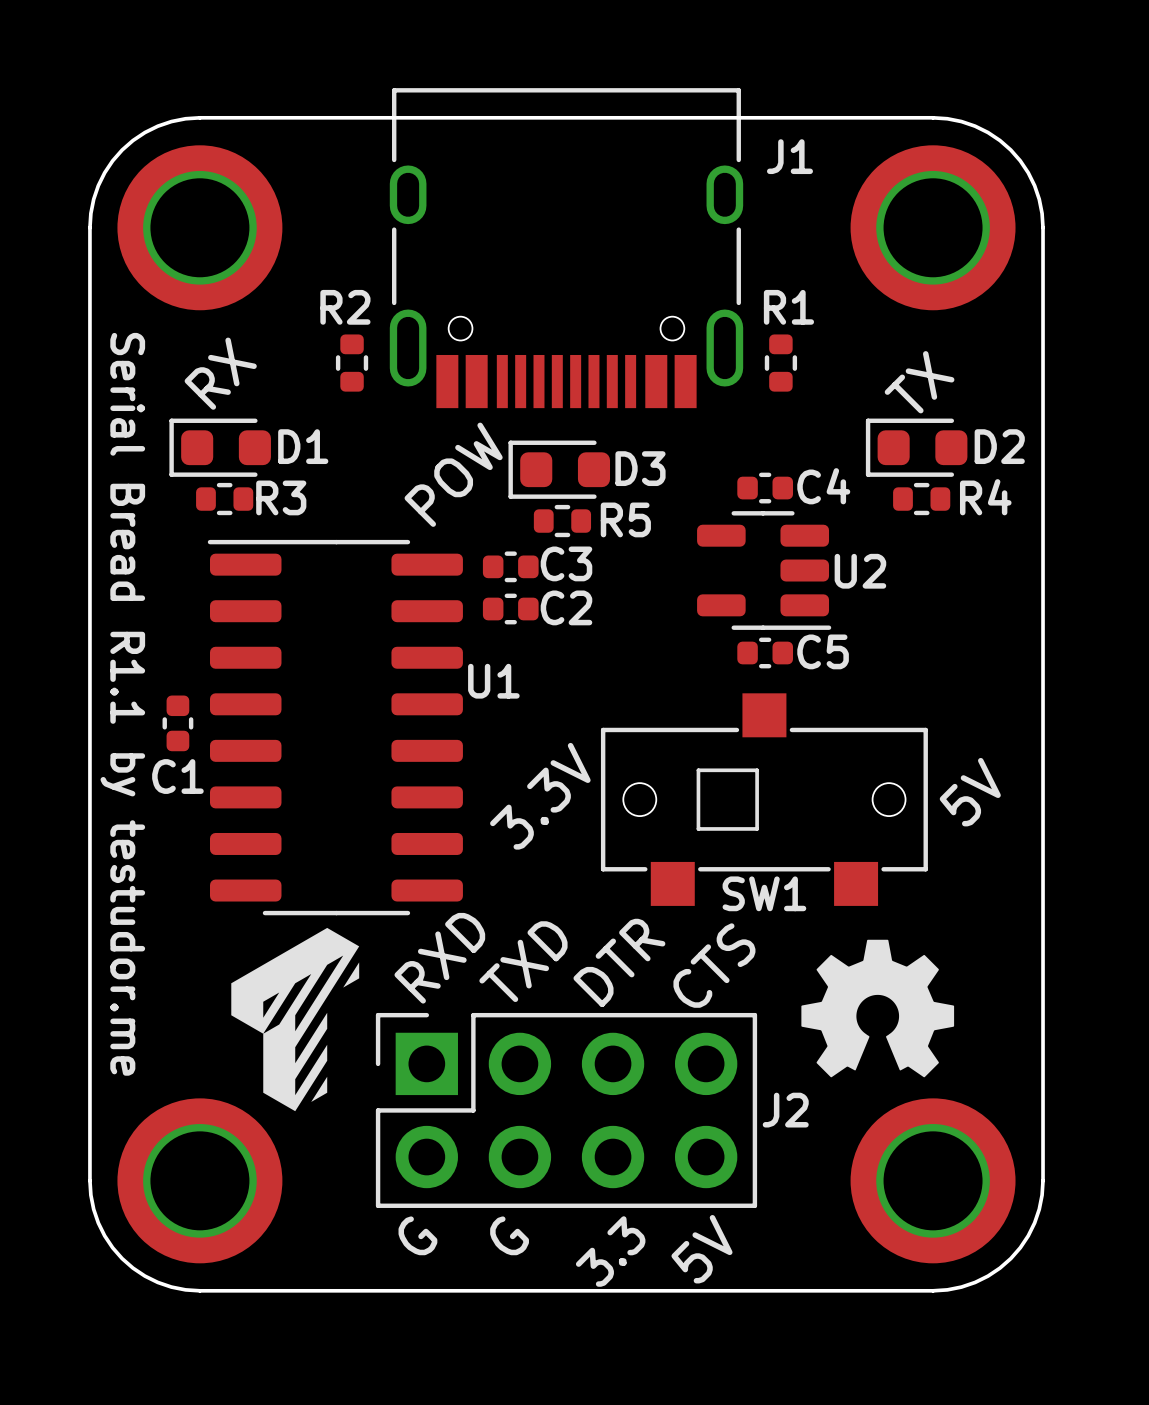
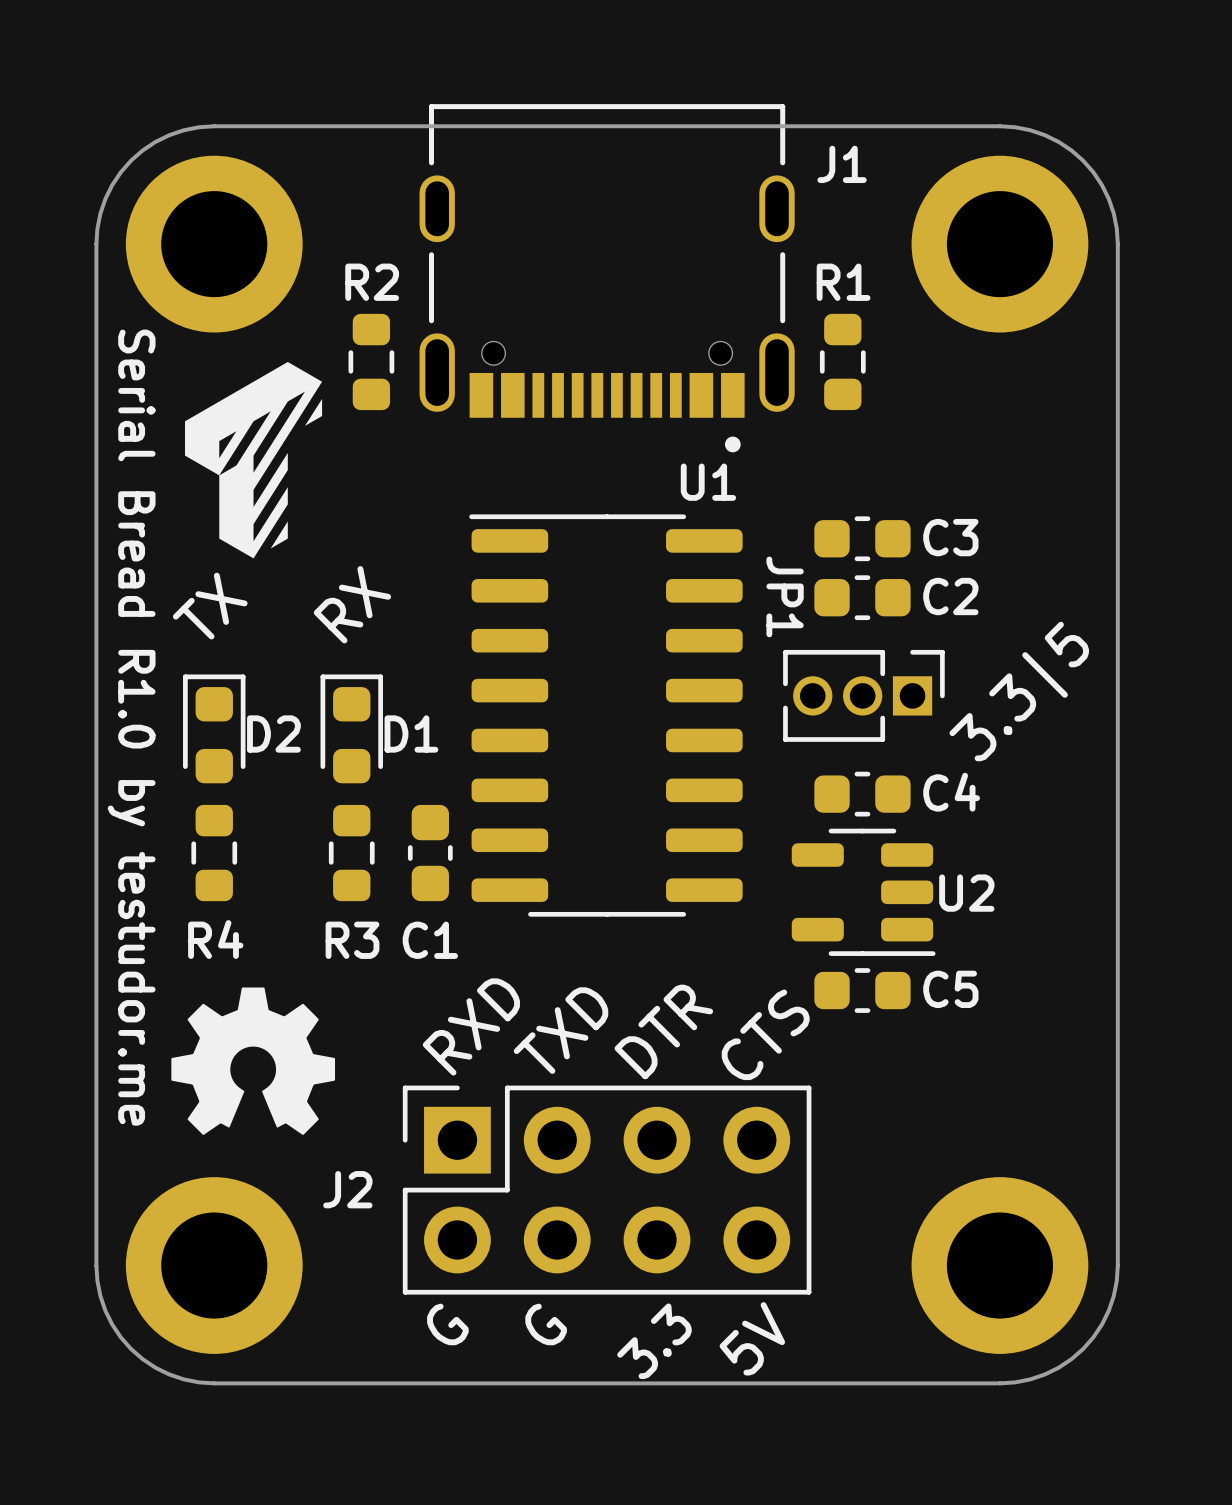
J1 footprint: [389, 88, 744, 409] -> [419, 104, 795, 453]
R2 footprint: [335, 334, 369, 392] -> [348, 313, 395, 411]
R1 footprint: [764, 334, 798, 392] -> [819, 313, 866, 411]
text position: RX (220, 373) -> RX (352, 604)
text position: TX (919, 382) -> TX (210, 606)
D1 rotation: 0° (220, 447) -> 90° clockwise (351, 728)
D1 position: (220, 447) -> (351, 728)
D2 rotation: 0° (916, 447) -> 90° clockwise (214, 728)
D2 position: (916, 447) -> (214, 728)
D3: (559, 469) -> none
C4 footprint: [737, 472, 794, 504] -> [814, 771, 911, 817]
text: POW (453, 474) -> none
R3 footprint: [196, 482, 254, 516] -> [328, 804, 375, 902]
R4 footprint: [893, 482, 951, 516] -> [191, 804, 238, 902]
R3 name position: R3 (281, 497) -> R3 (352, 940)
R4 name position: R4 (985, 497) -> R4 (215, 939)
R5: (562, 521) -> none
C3 footprint: [482, 551, 539, 583] -> [814, 516, 911, 562]
U2 position: (764, 570) -> (863, 892)
C2 footprint: [482, 593, 539, 625] -> [814, 575, 911, 621]
C5 footprint: [737, 637, 794, 669] -> [814, 968, 911, 1013]
text: none -> 3.3|5 (1019, 691)
JP1: none -> (863, 695)
U1 name position: U1 (493, 681) -> U1 (708, 482)
C1 footprint: [162, 695, 194, 752] -> [407, 804, 453, 902]
text: Serial Bread R1.1 by testudor.me (122, 704) -> Serial Bread R1.0 by testudor.me (131, 727)
U1 position: (335, 727) -> (605, 715)
text: 5V (970, 792) -> none
text: 3.3V (540, 796) -> none
SW1: (764, 799) -> none
drawing position: (877, 1008) -> (253, 1061)
drawing position: (295, 1019) -> (253, 460)
J2 name position: J2 (785, 1110) -> J2 (347, 1189)

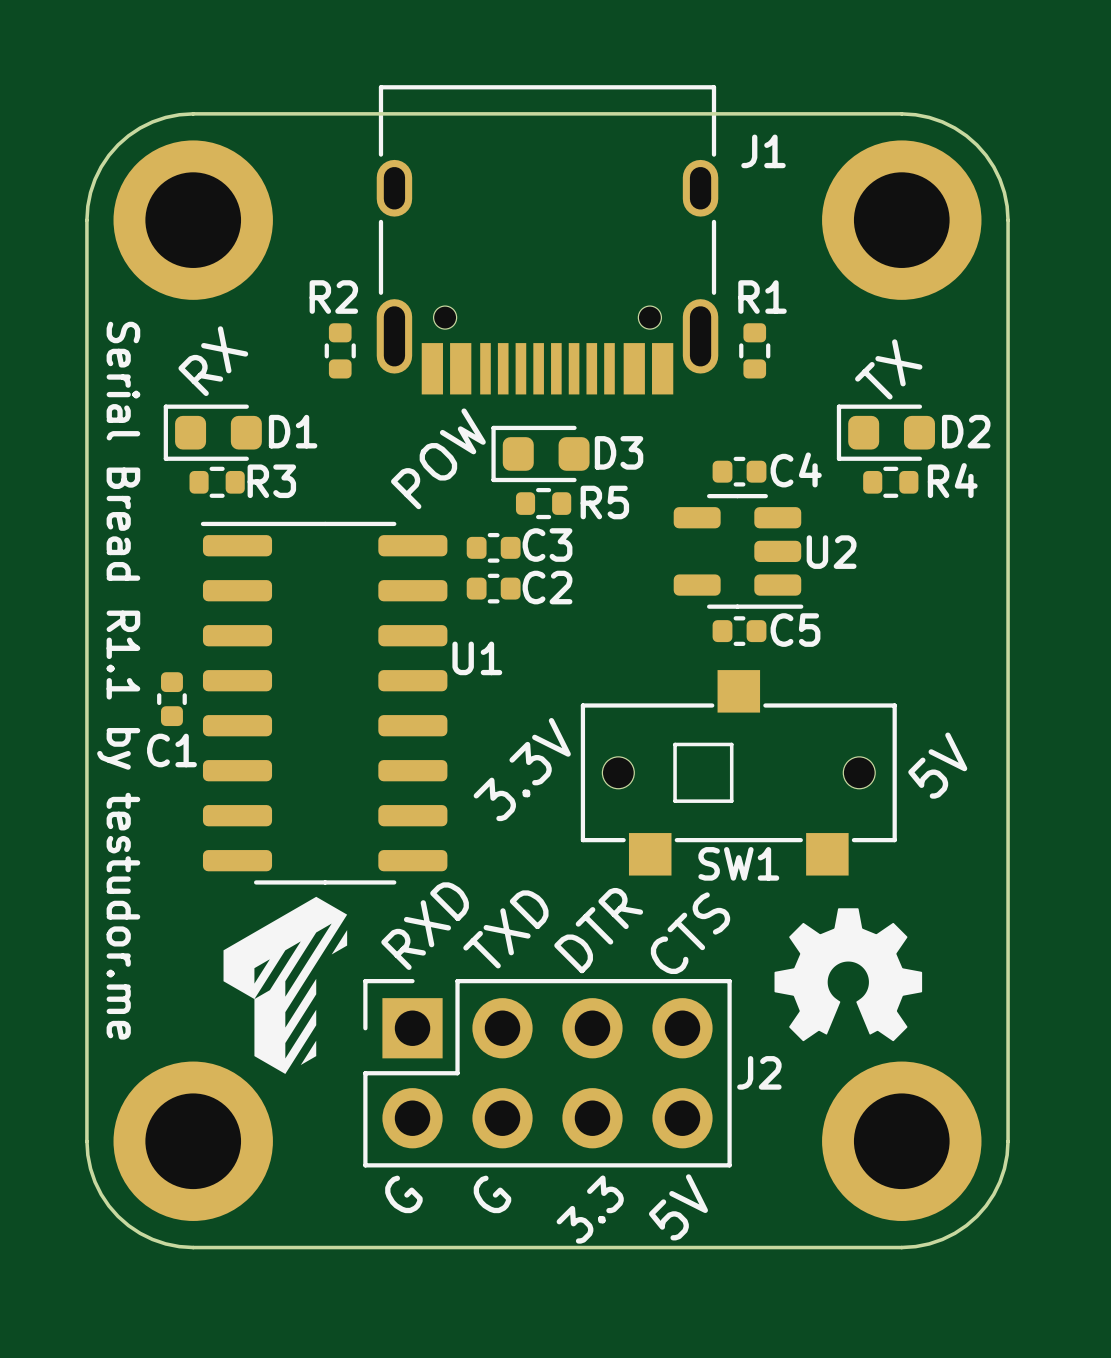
J1 footprint: [419, 104, 795, 453] -> [376, 85, 719, 395]
R2 footprint: [348, 313, 395, 411] -> [324, 323, 356, 379]
R1 footprint: [819, 313, 866, 411] -> [739, 323, 771, 379]
drawing position: (253, 460) -> (285, 985)
U1 name position: U1 (708, 482) -> U1 (477, 658)
D3: none -> (540, 453)
text: none -> POW (438, 458)
C3 footprint: [814, 516, 911, 562] -> [466, 532, 521, 563]
R5: none -> (543, 503)
C2 footprint: [814, 575, 911, 621] -> [466, 573, 521, 604]
text position: RX (352, 604) -> RX (213, 361)
text position: TX (210, 606) -> TX (888, 369)
text: 3.3|5 (1019, 691) -> none
JP1: (863, 695) -> none
U1 position: (605, 715) -> (324, 703)
text: Serial Bread R1.0 by testudor.me (131, 727) -> Serial Bread R1.1 by testudor.me (118, 680)
D2 rotation: 0° (214, 728) -> 90° counterclockwise (885, 432)
D2 position: (214, 728) -> (885, 432)
D1 rotation: 0° (351, 728) -> 90° counterclockwise (212, 432)
D1 position: (351, 728) -> (212, 432)
C4 footprint: [814, 771, 911, 817] -> [712, 456, 767, 487]
R4 footprint: [191, 804, 238, 902] -> [863, 466, 919, 498]
R3 footprint: [328, 804, 375, 902] -> [189, 466, 245, 498]
C1 footprint: [407, 804, 453, 902] -> [157, 672, 187, 727]
text: none -> 5V (937, 765)
text: none -> 3.3V (522, 769)
SW1: none -> (738, 772)
U2 position: (863, 892) -> (738, 551)
R4 name position: R4 (215, 939) -> R4 (952, 480)
R3 name position: R3 (352, 940) -> R3 (271, 481)
C5 footprint: [814, 968, 911, 1013] -> [712, 616, 767, 646]
drawing position: (253, 1061) -> (848, 974)
J2 name position: J2 (347, 1189) -> J2 (759, 1072)

